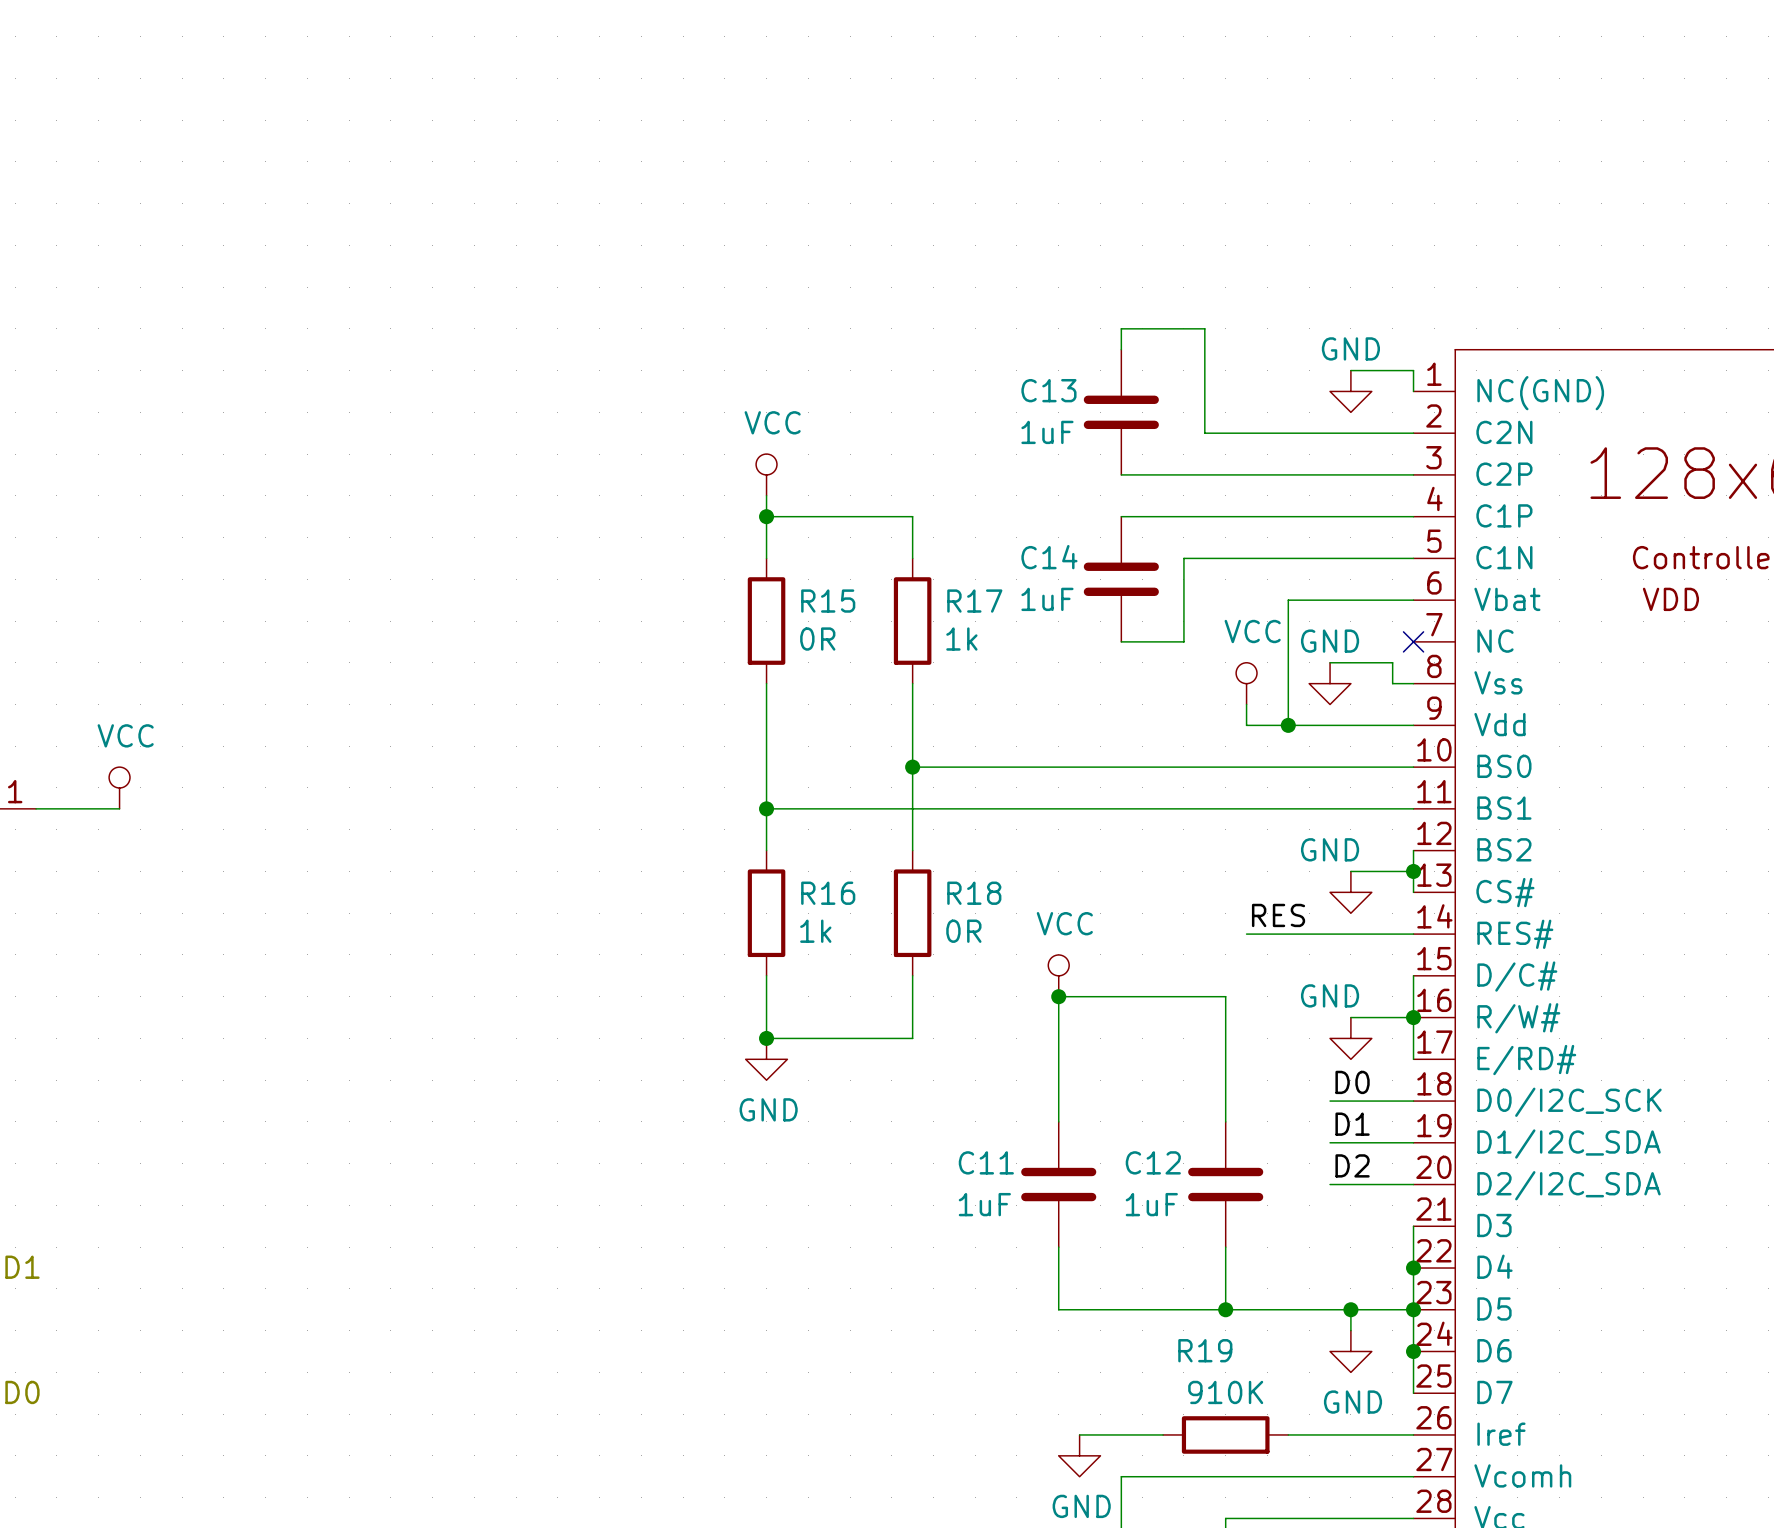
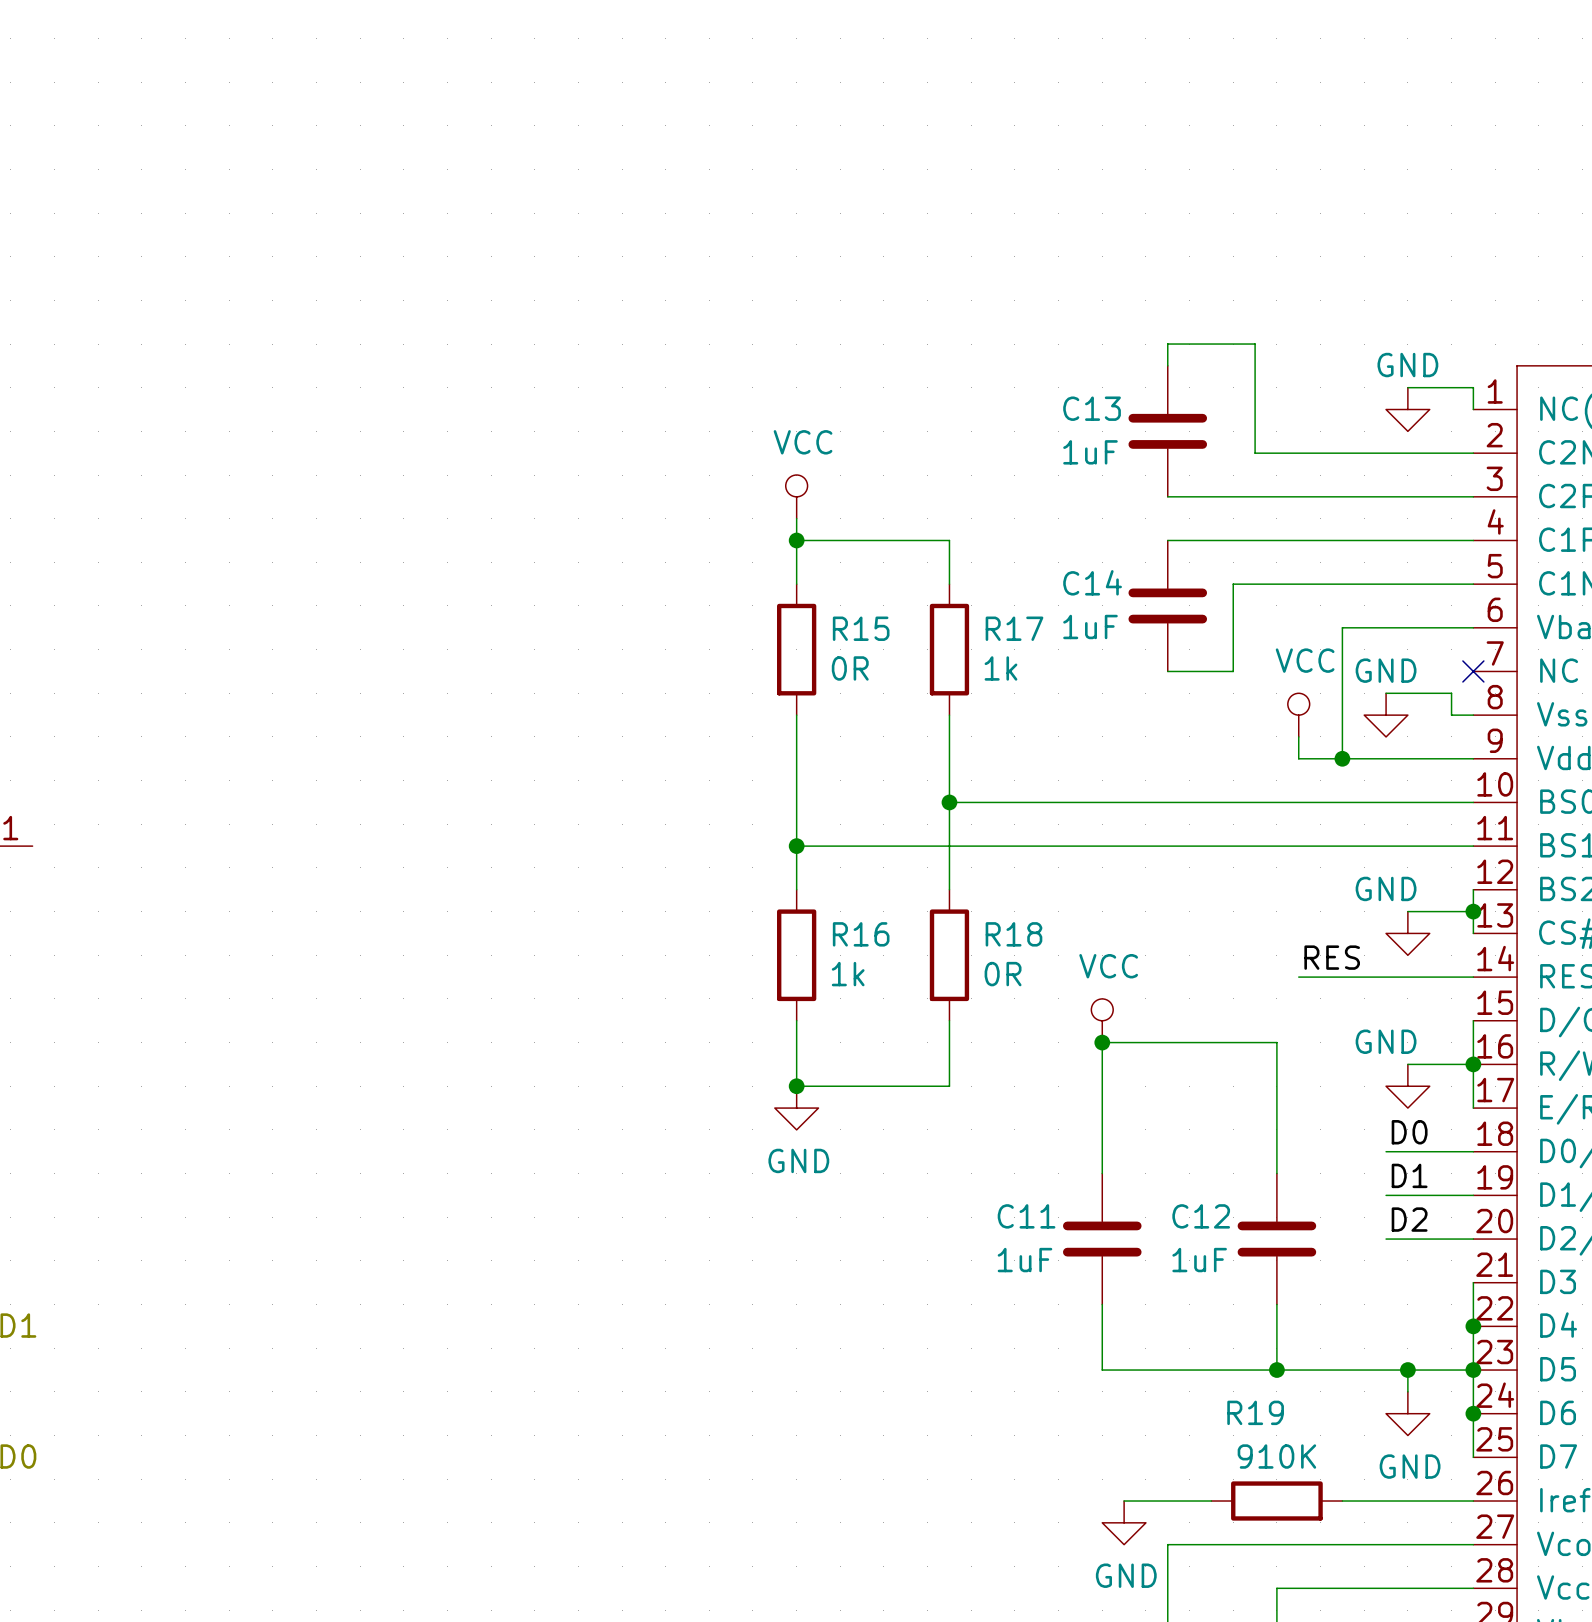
power symbol: VCC (119, 787) -> none
wire: (36, 808) (119, 808) -> none

